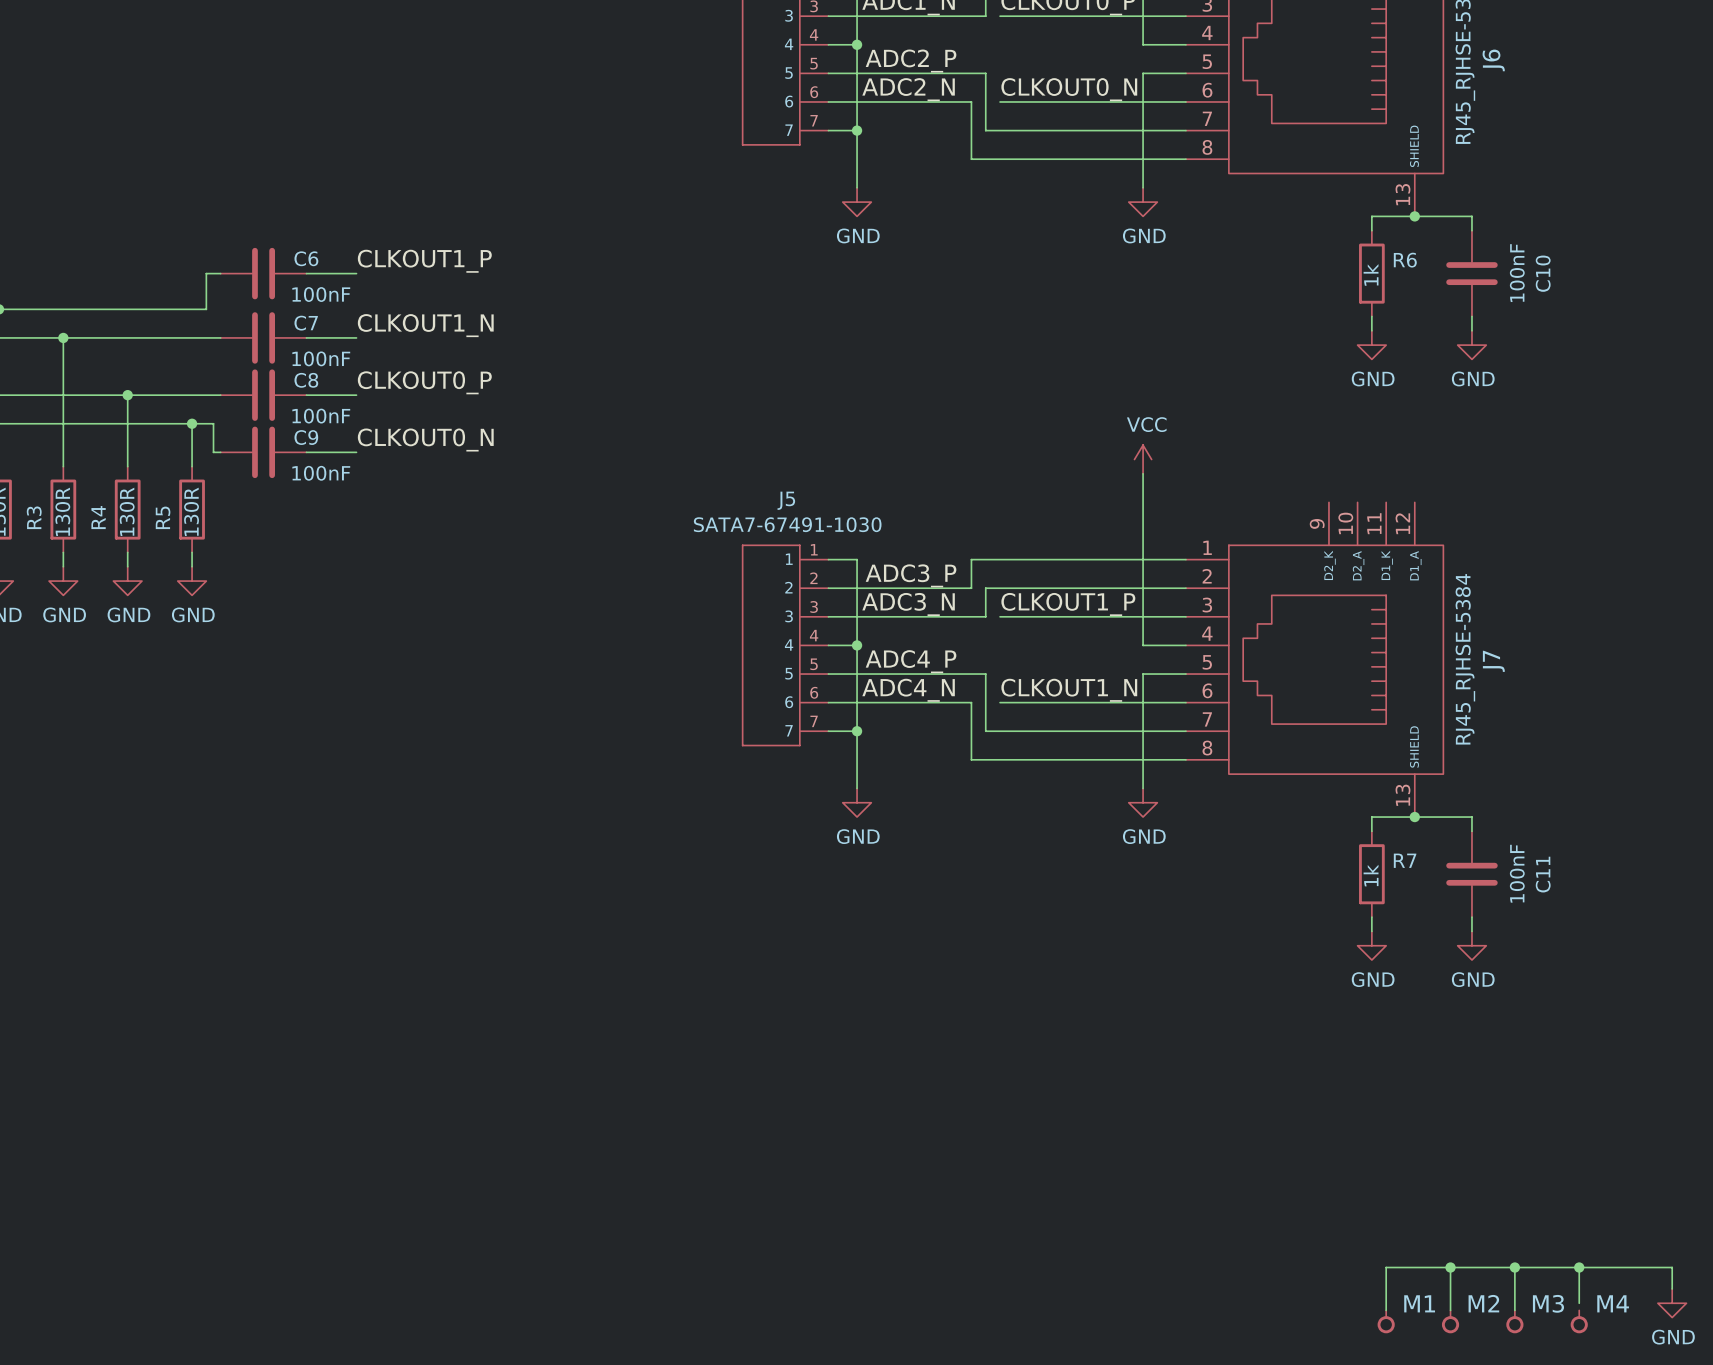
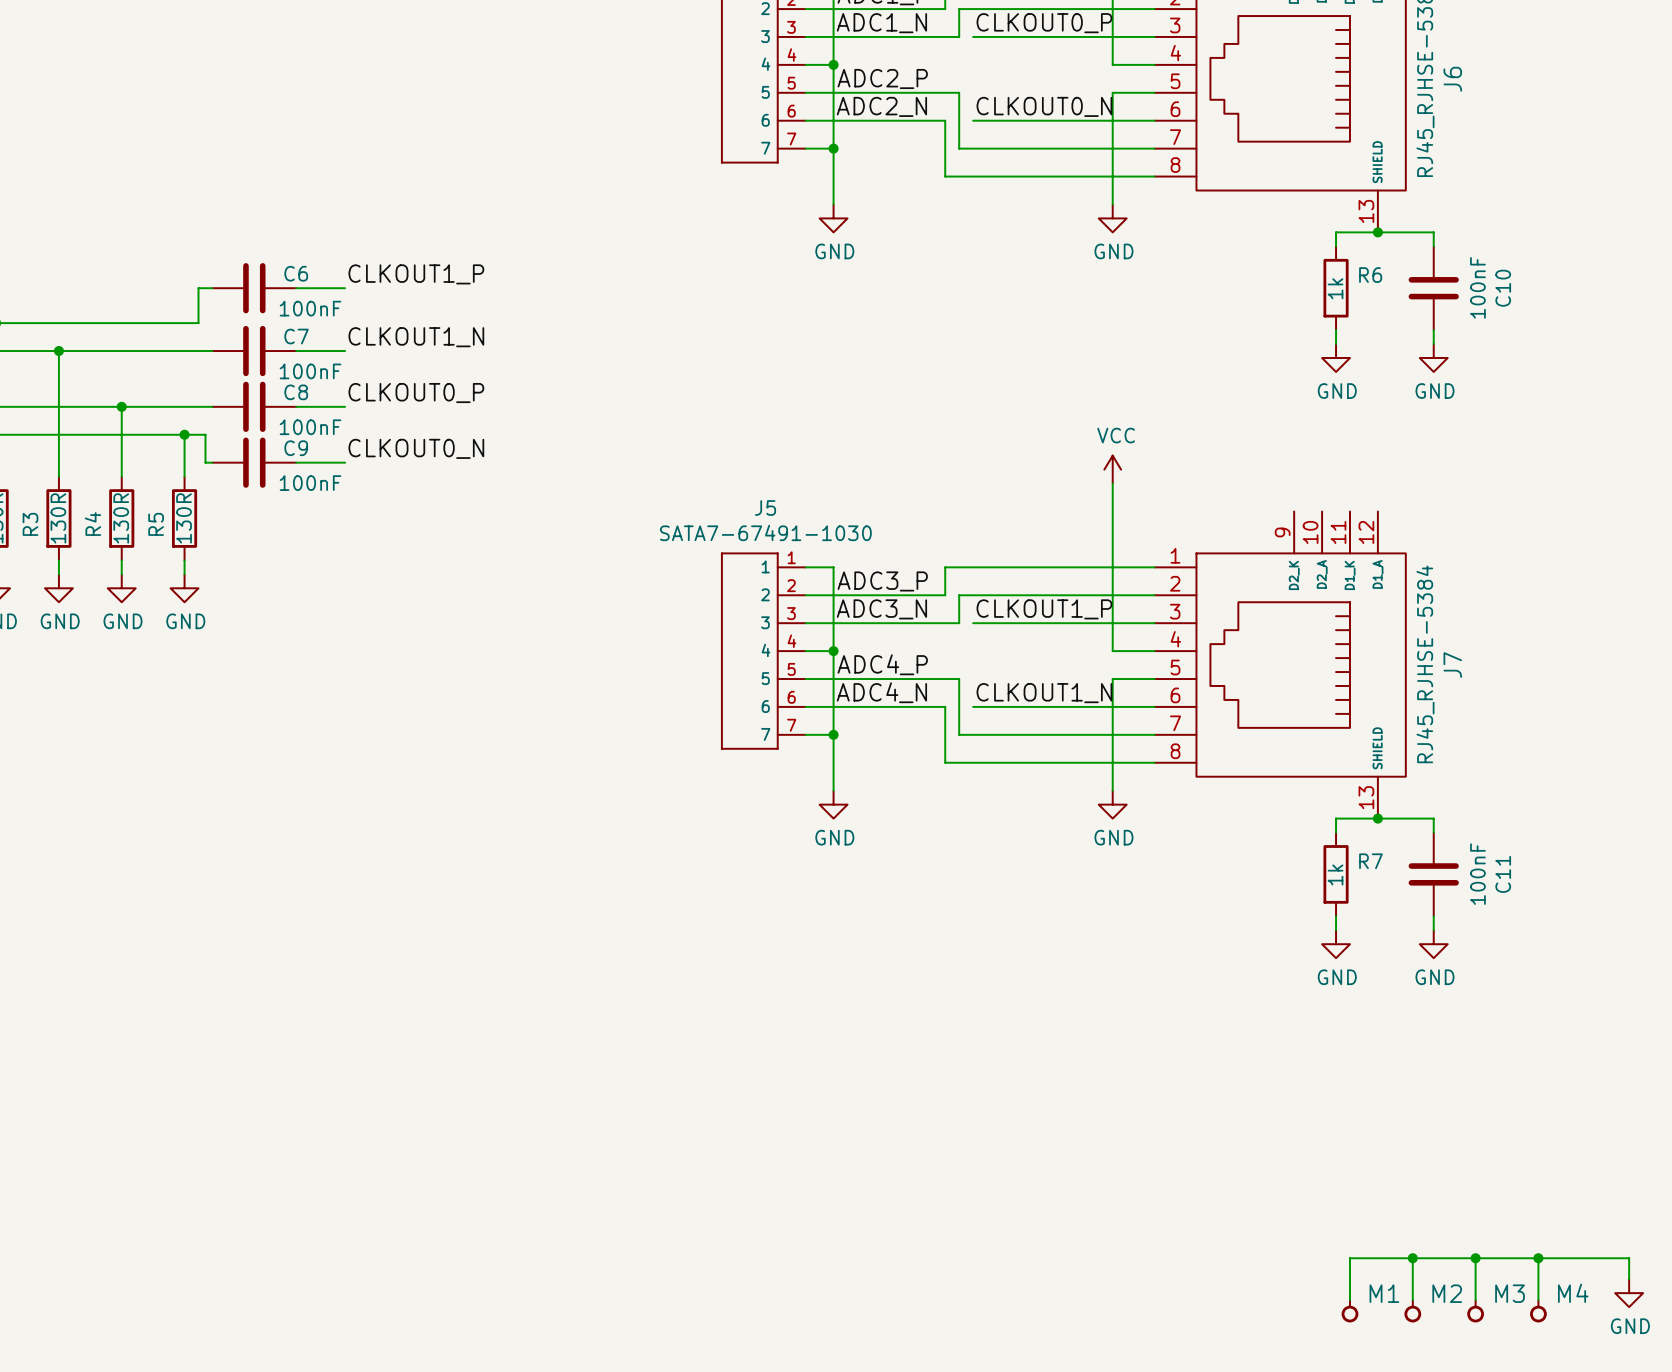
wire: none -> (1538, 1293) (1538, 1300)

